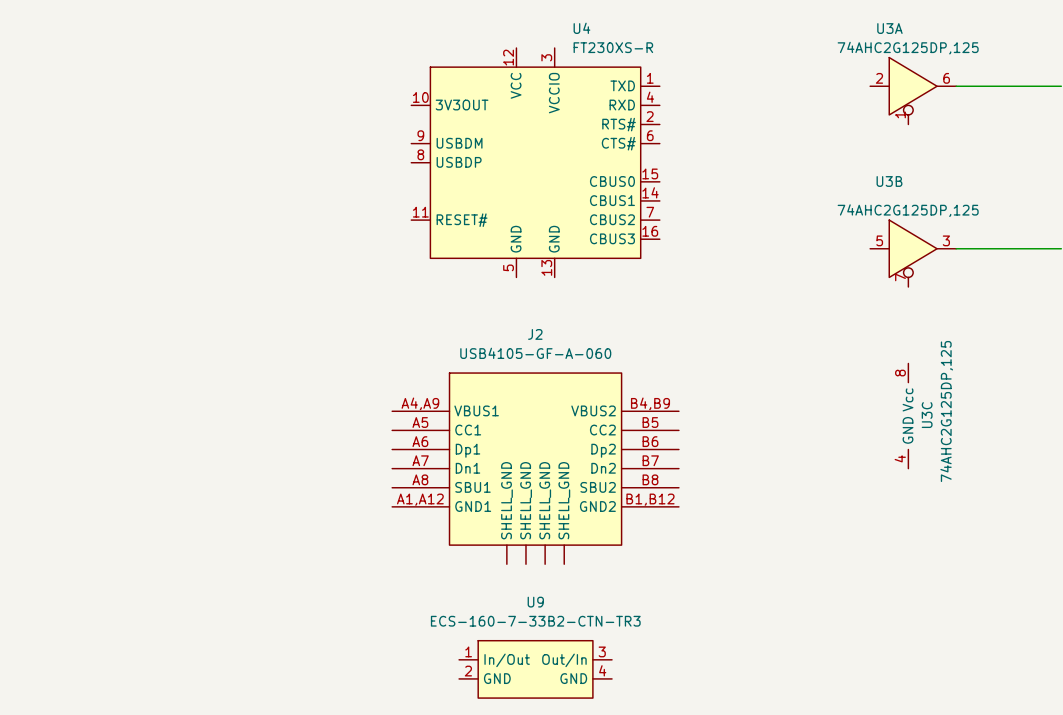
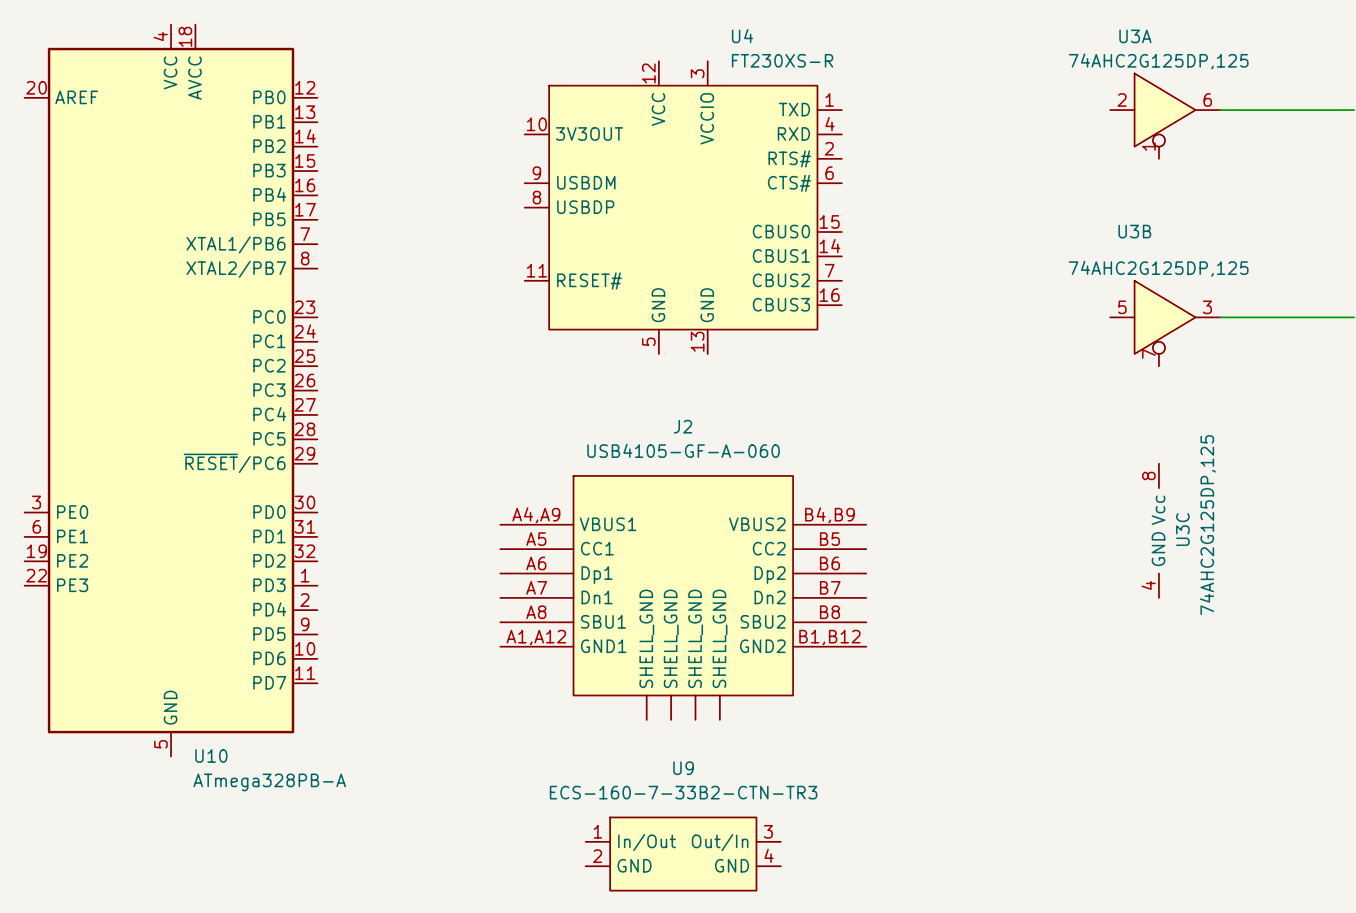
U10: none -> ATmega328PB-A (171, 390)

